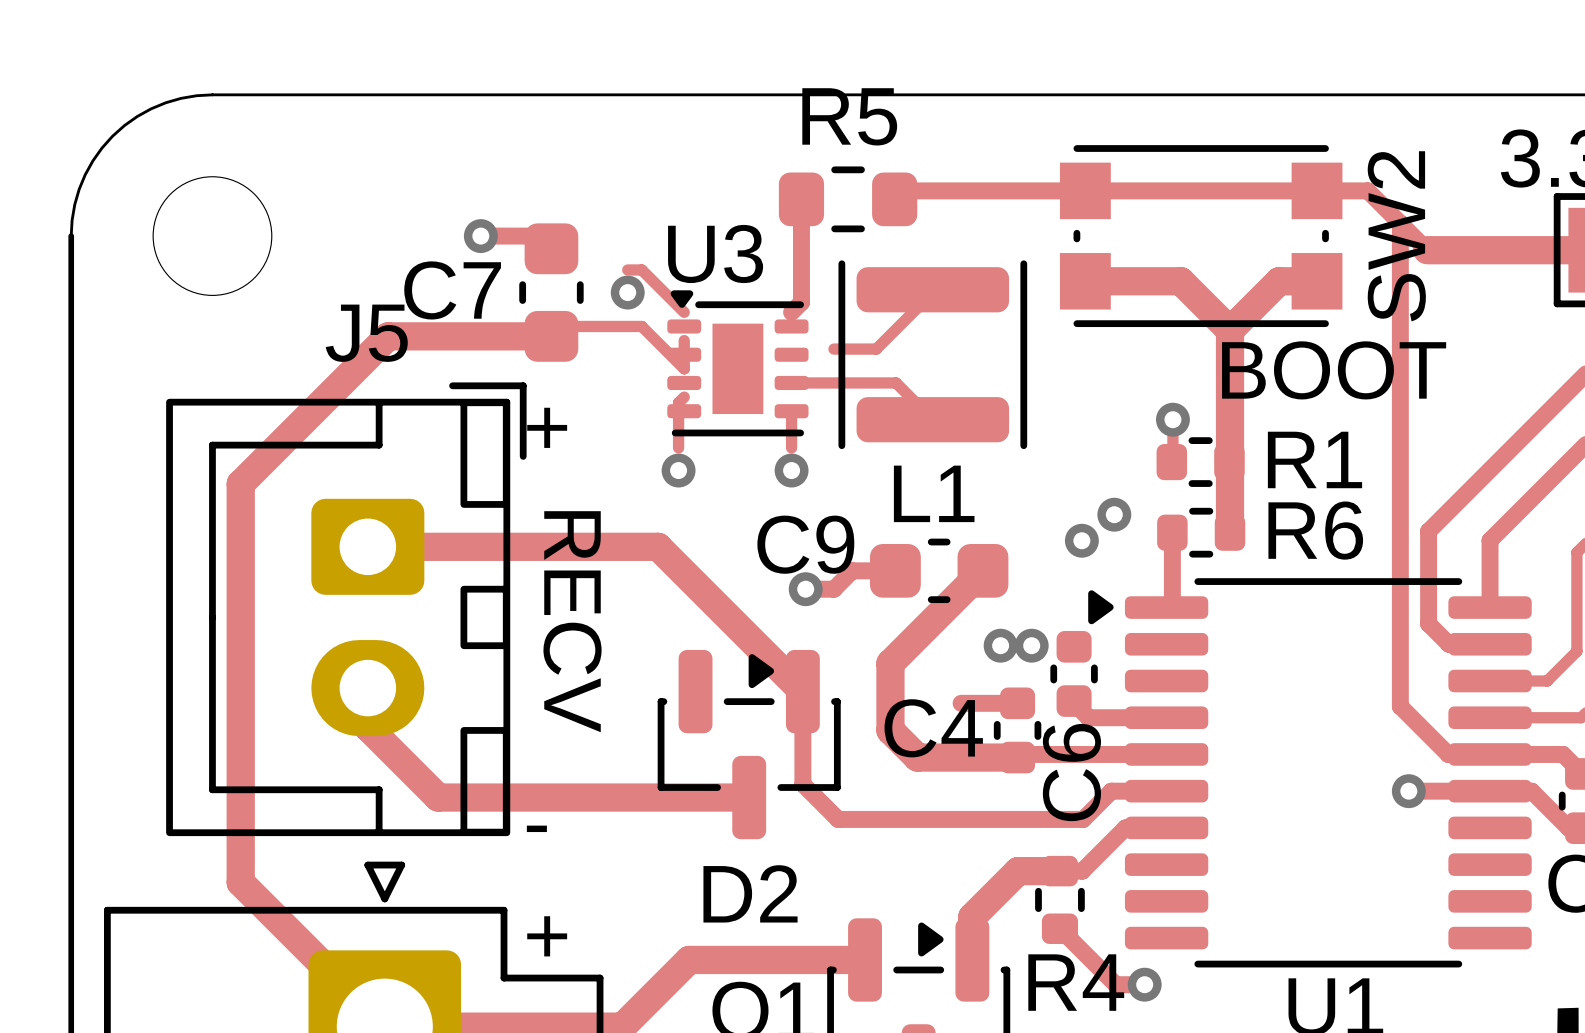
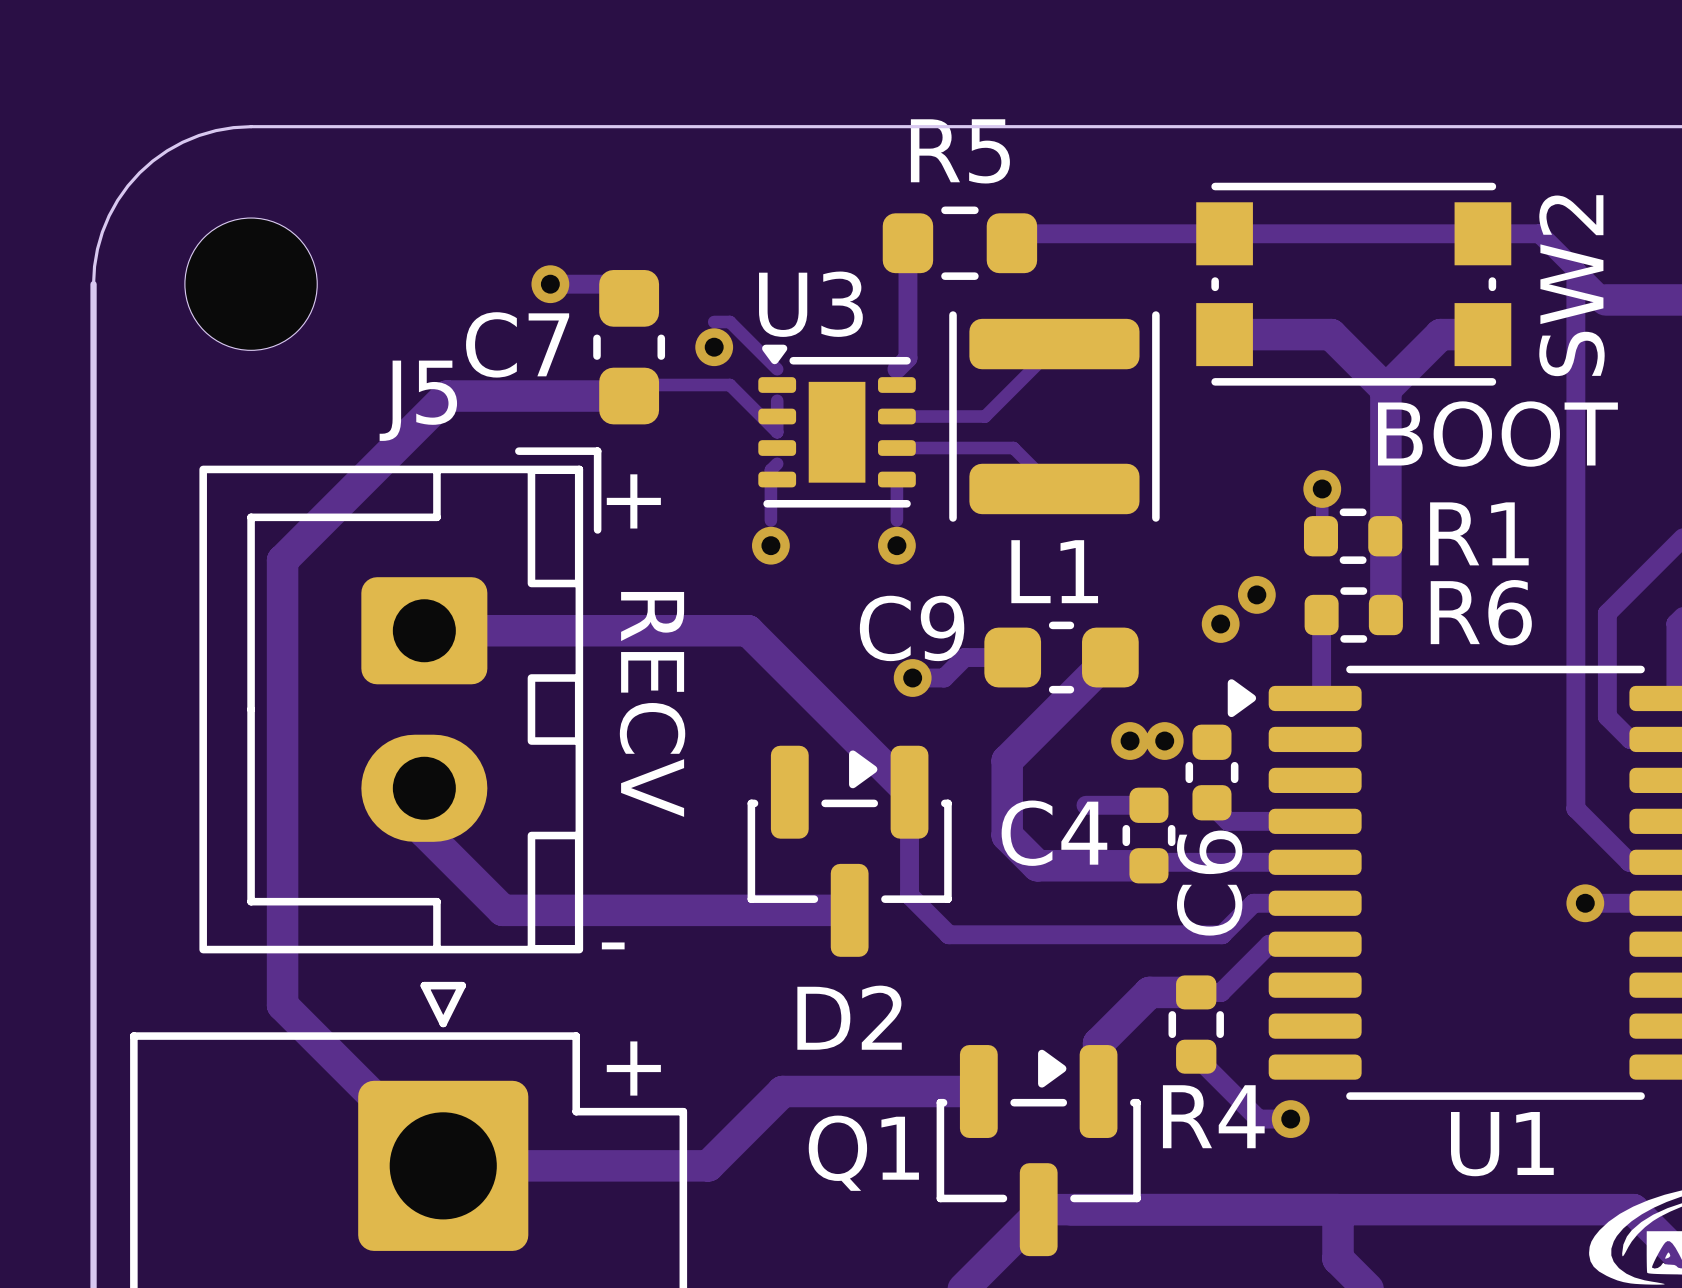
track: (833, 349) (876, 349) -> (896, 416) (985, 416) (991, 410)

